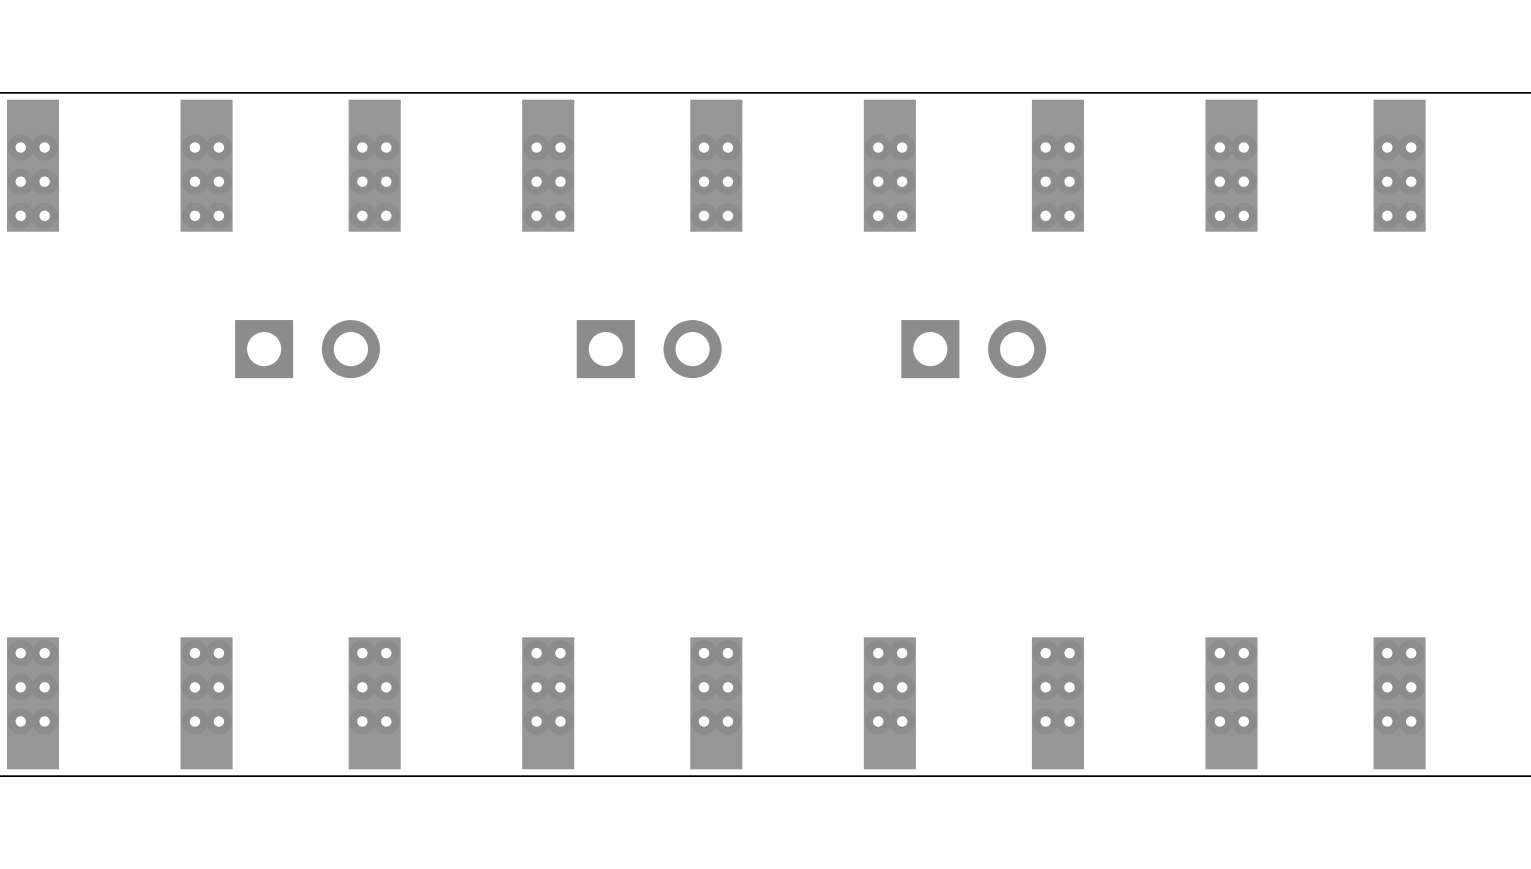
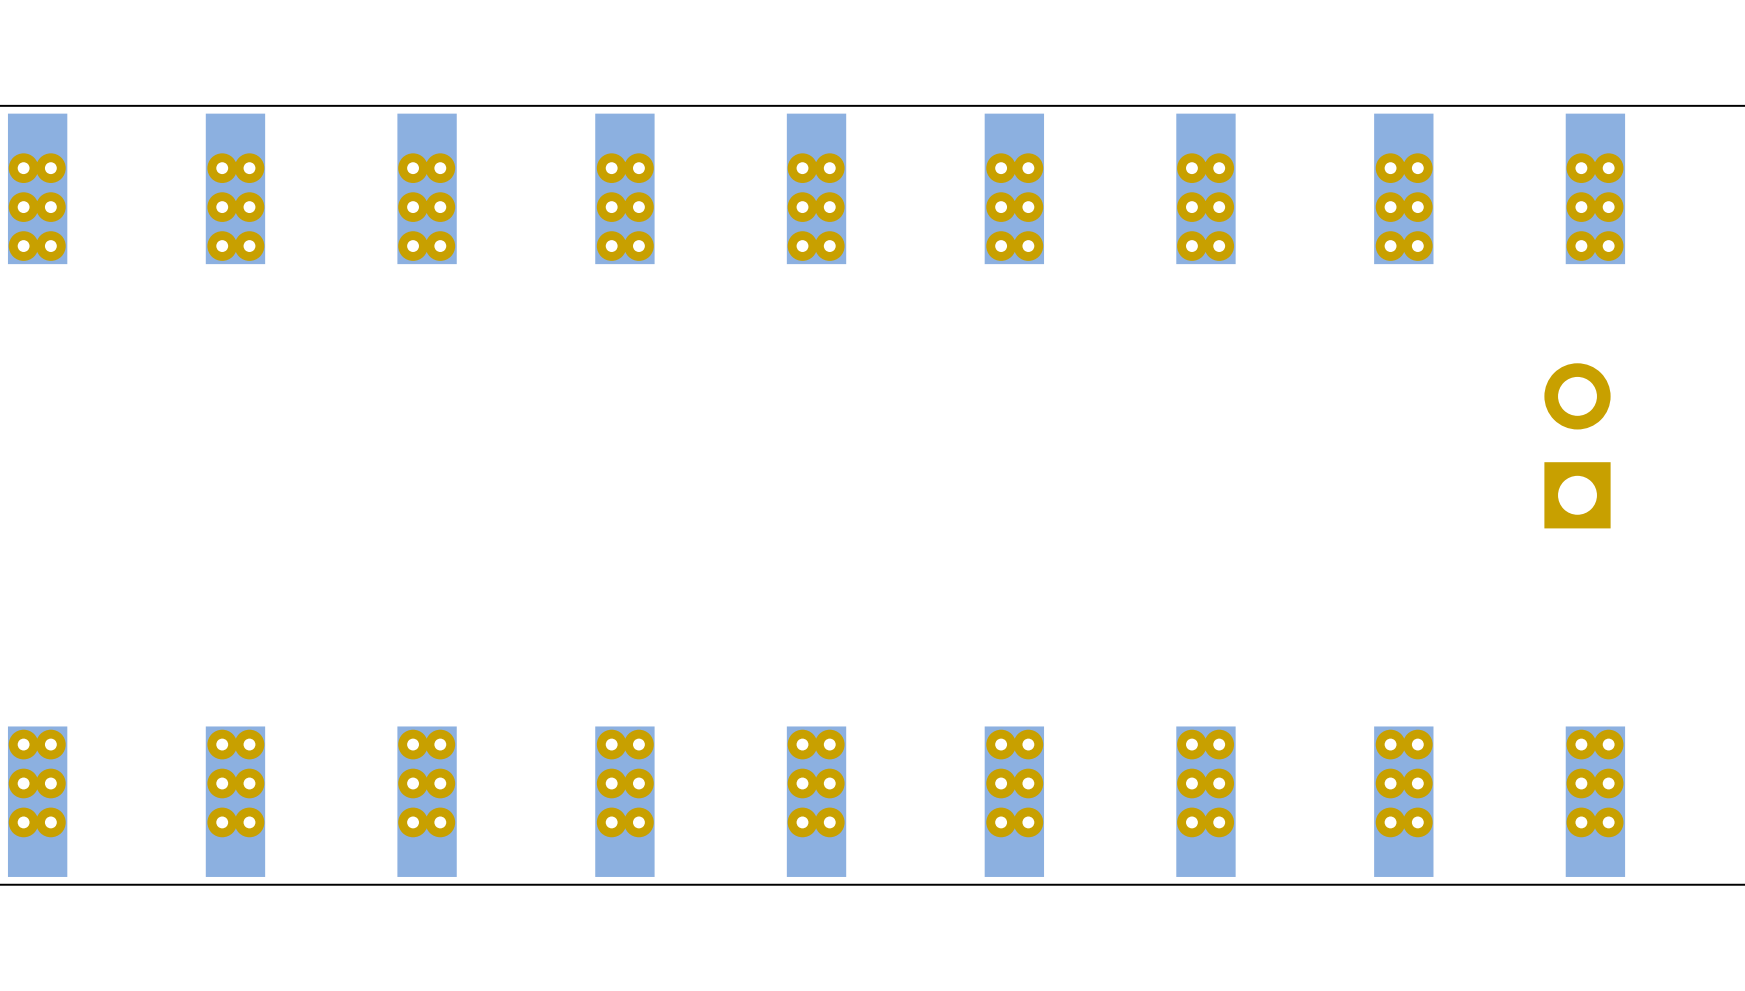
part: (307, 349) -> none
part: (649, 349) -> none
part: (973, 349) -> none
part: none -> (1577, 445)

